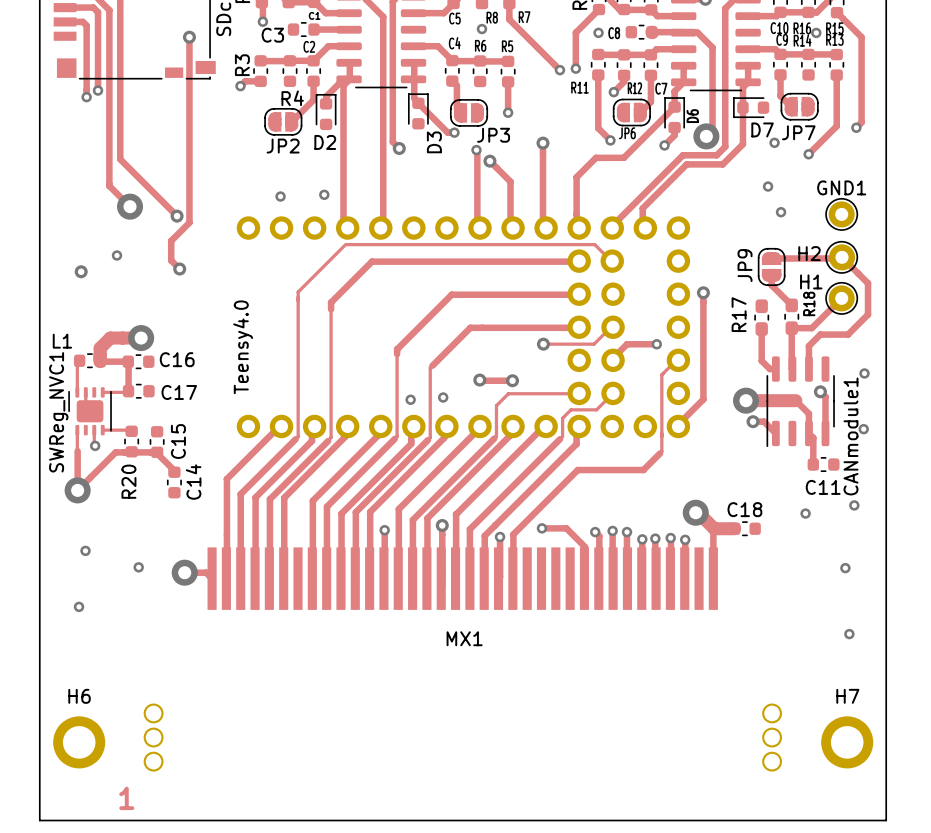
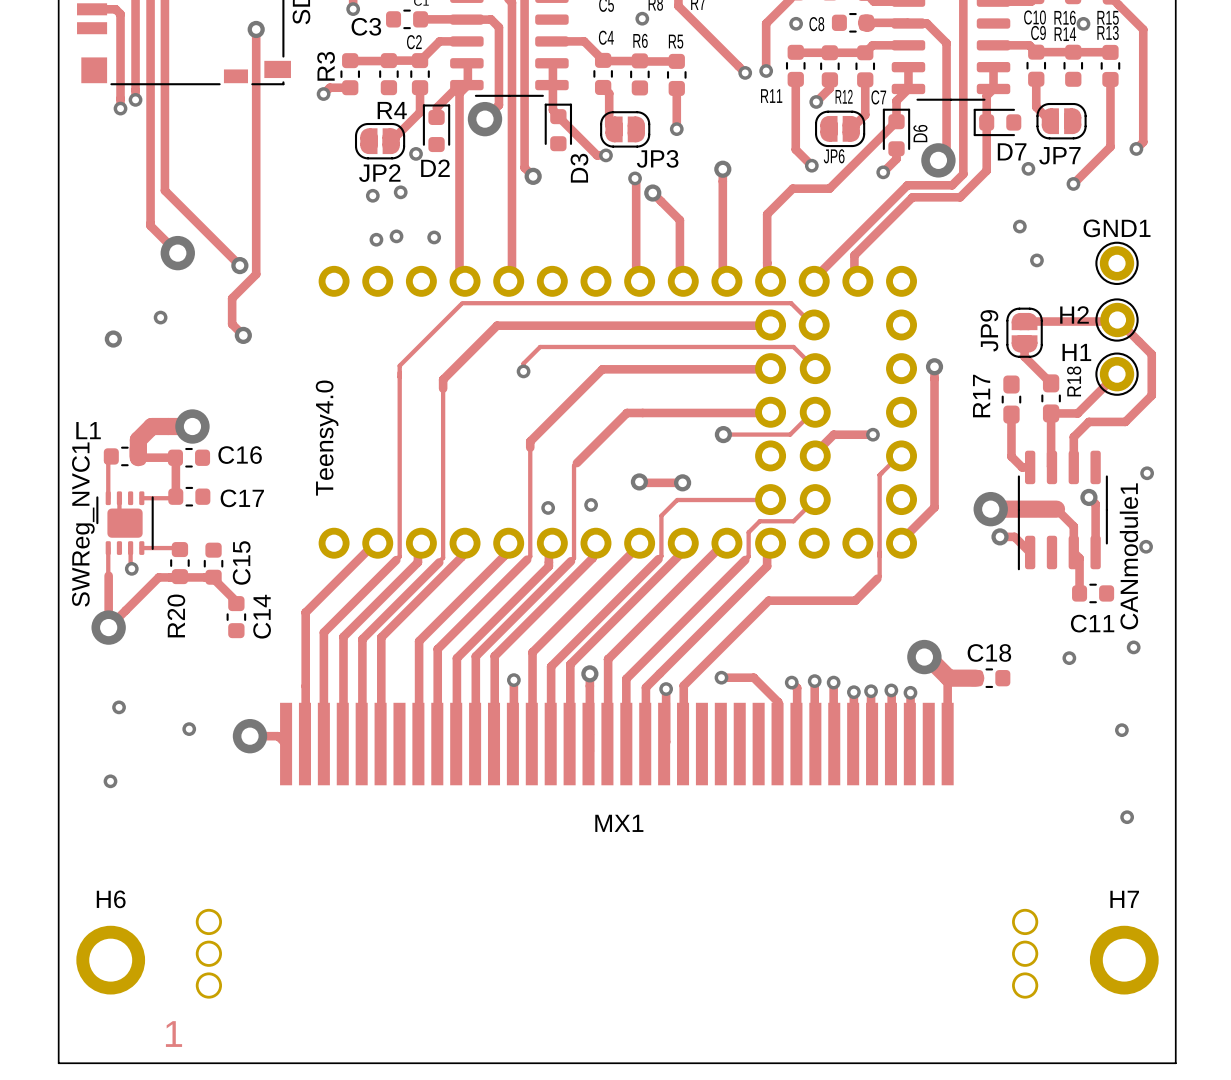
track: none -> (466, 19) (490, 19) (498, 27) (498, 105) (484, 119)
via: none -> (484, 119)
via: none -> (416, 153)
via: none -> (400, 192)
via: none -> (372, 195)
via: none -> (396, 236)
track: none -> (815, 368) (793, 346) (540, 346) (523, 363) (523, 371)
via: none -> (523, 371)

